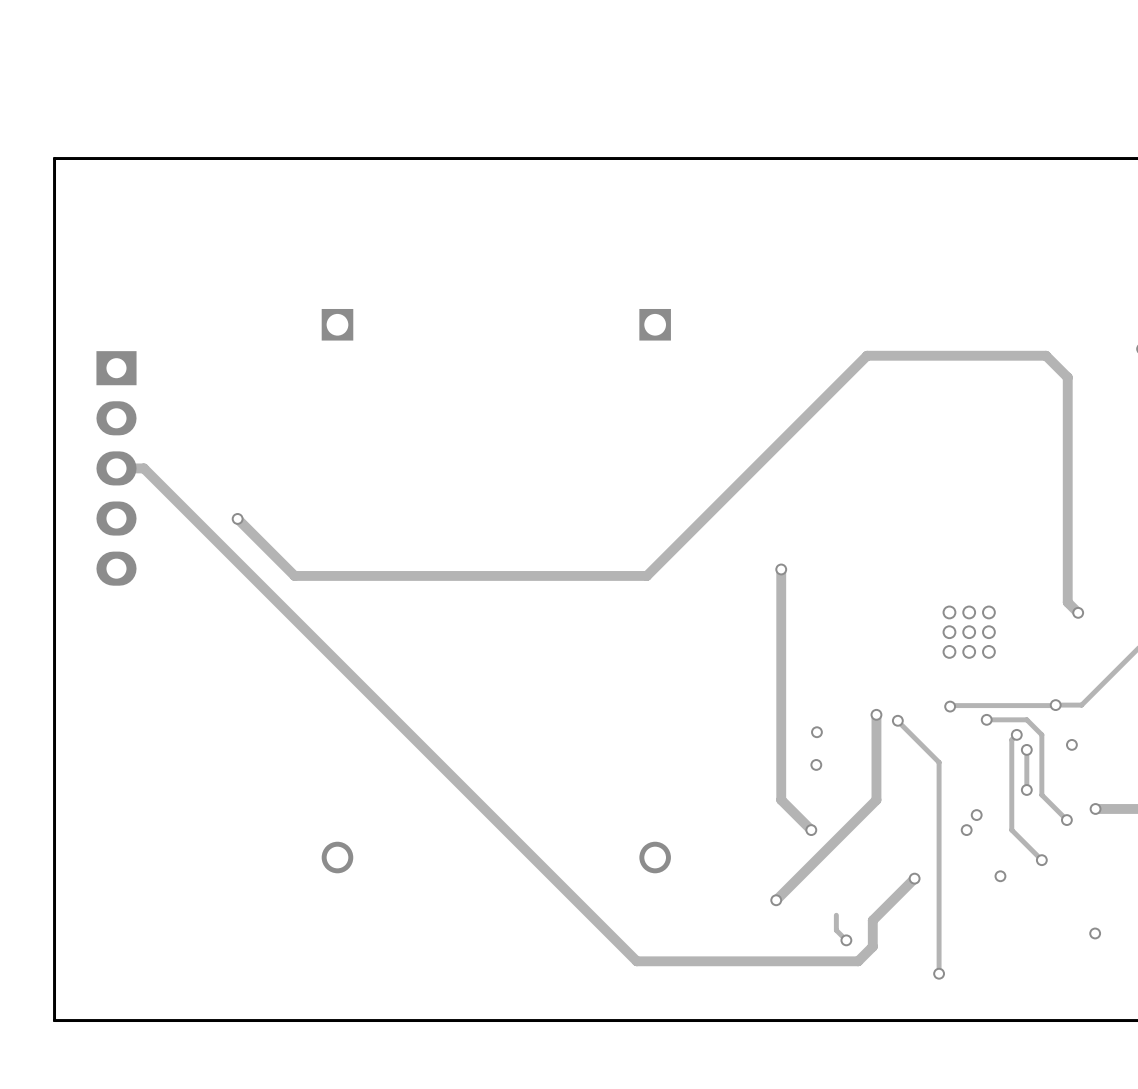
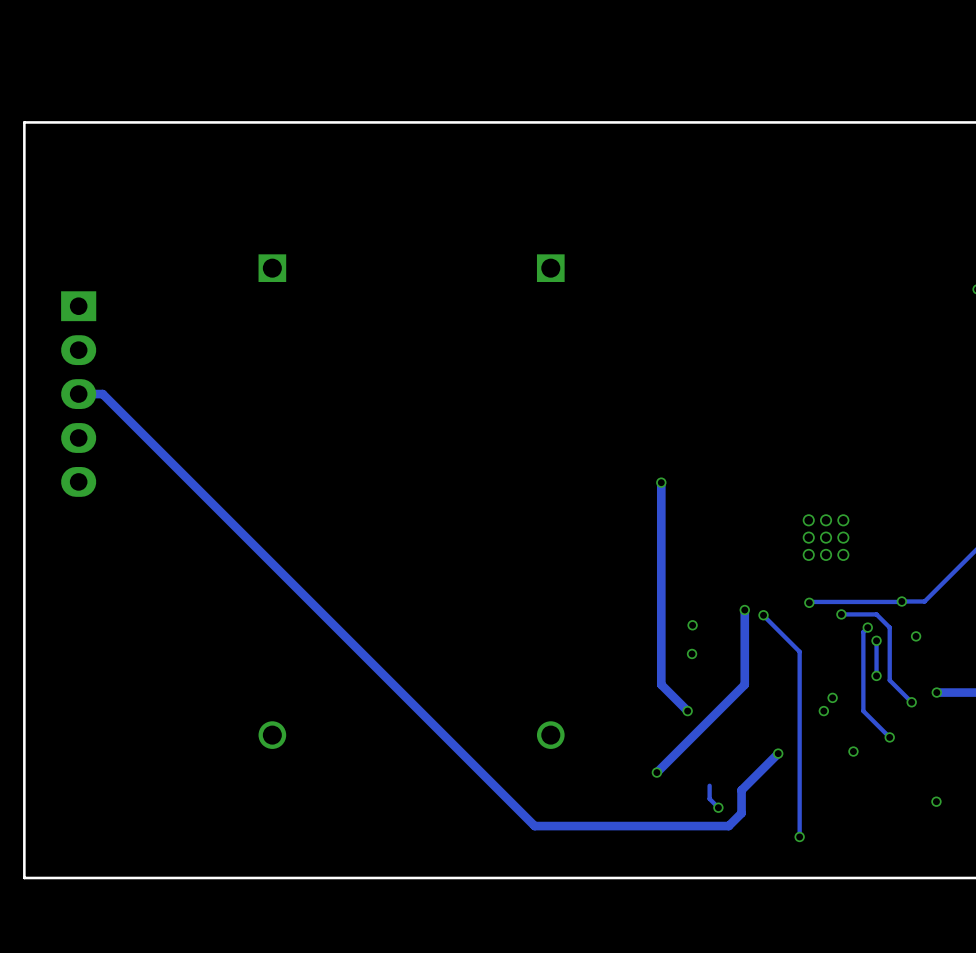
track: (237, 518) (294, 575) (646, 575) (867, 355) (1046, 355) (1067, 377) (1067, 602) (1078, 612) -> none
via: (237, 518) -> none
via: (1078, 612) -> none

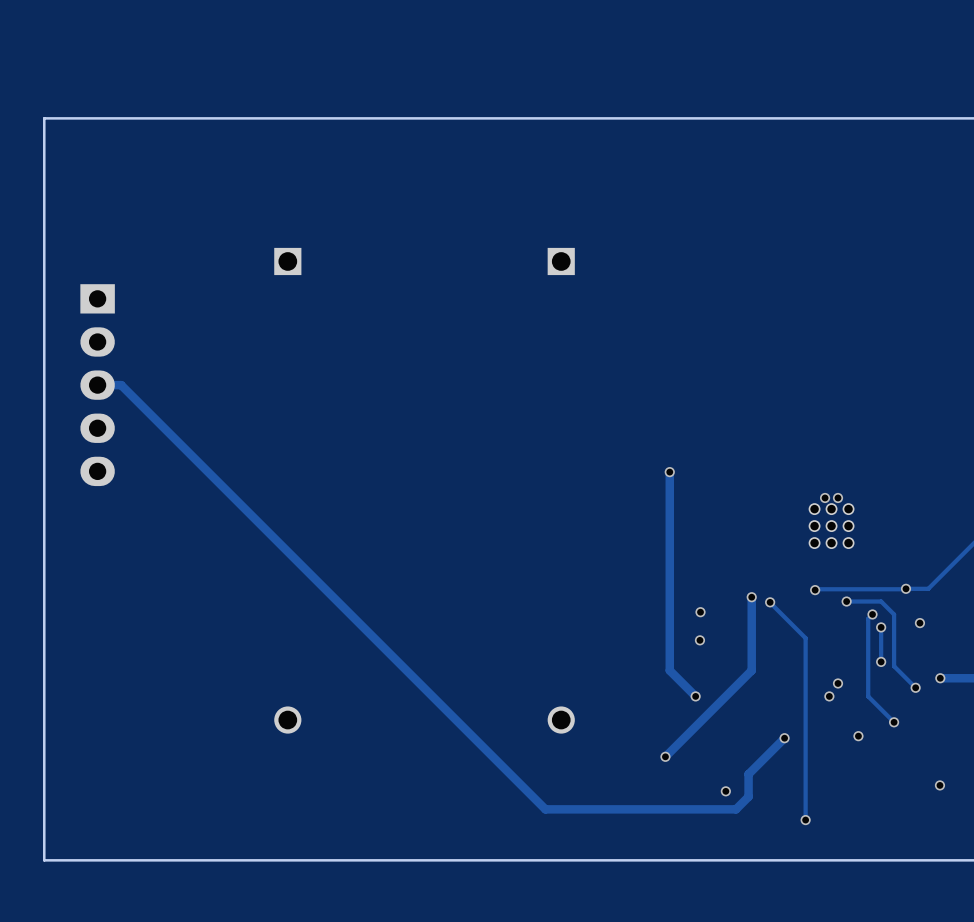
via: none -> (825, 497)
via: none -> (838, 497)
track: (709, 785) (709, 798) (718, 807) -> none

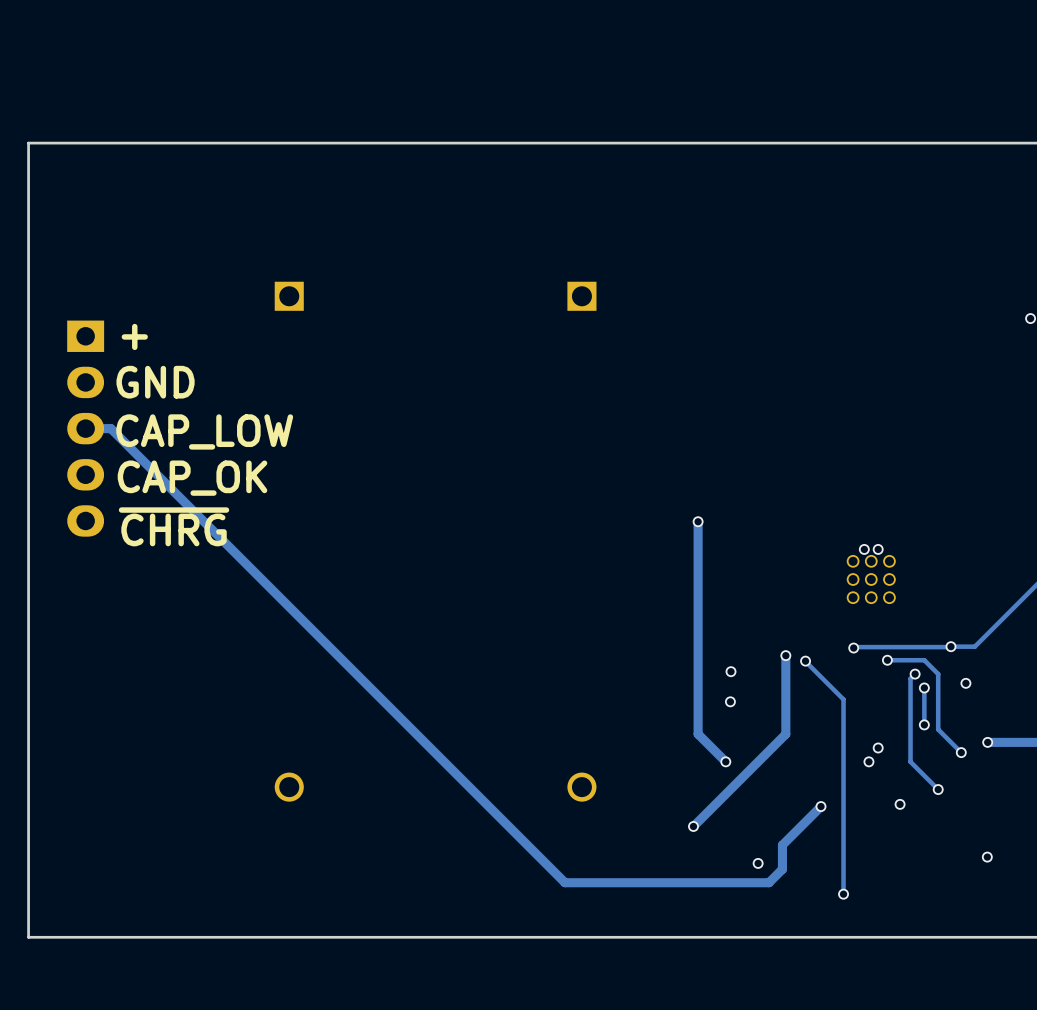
text: none -> + (134, 336)
text: none -> GND (155, 382)
text: none -> CAP_LOW (204, 431)
text: none -> CAP_OK (192, 478)
text: none -> ~{CHRG} (174, 526)

